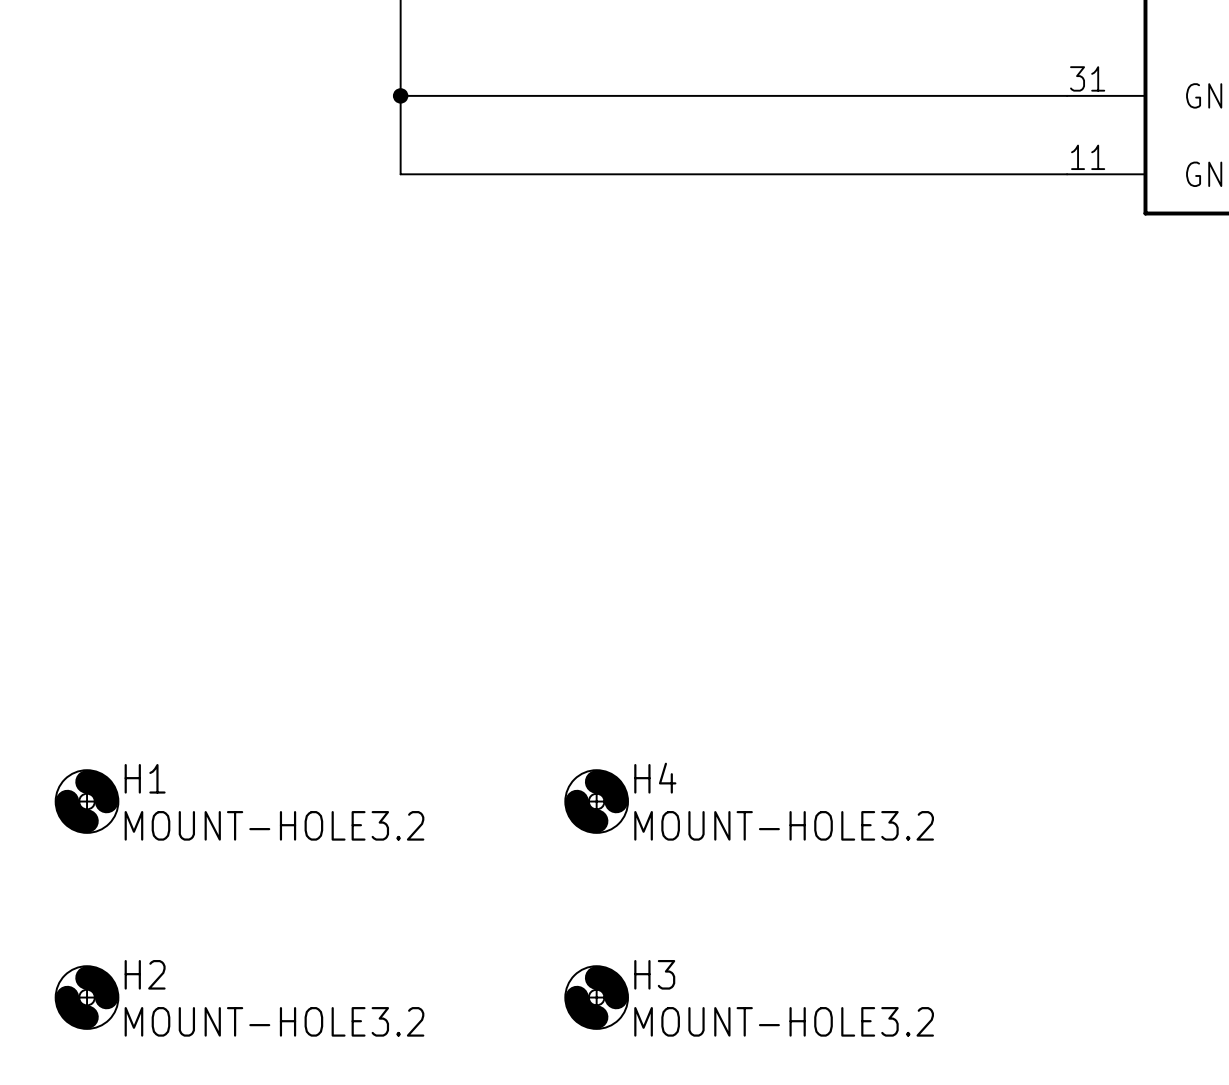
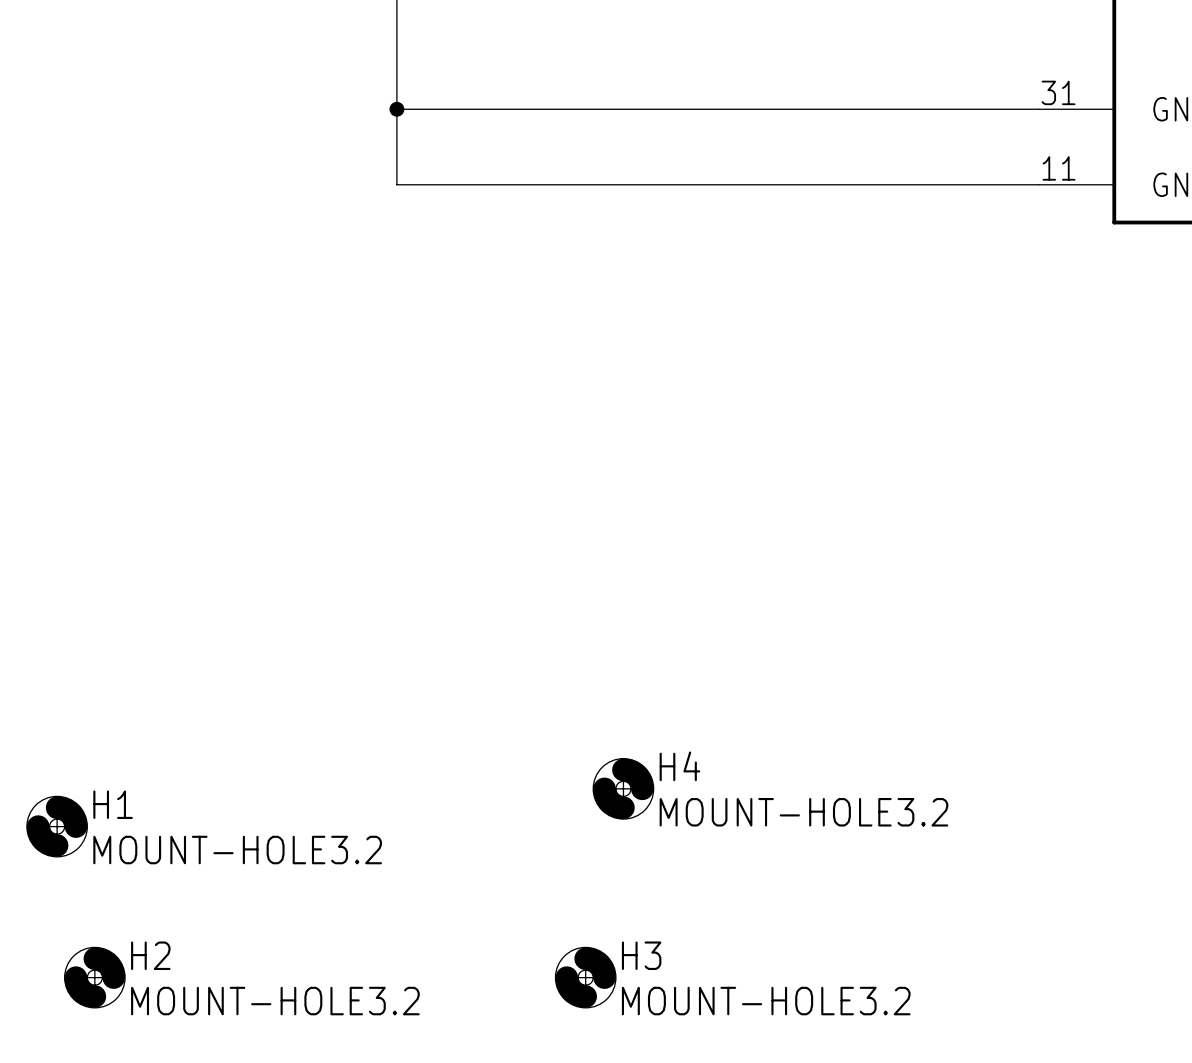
H1 position: (87, 801) -> (57, 826)
H4 position: (596, 801) -> (623, 788)

